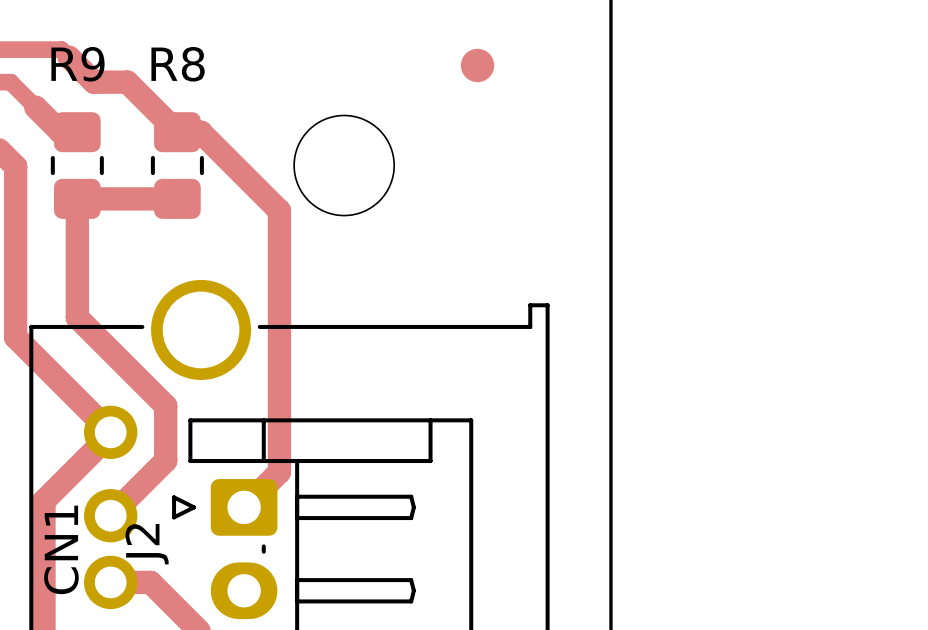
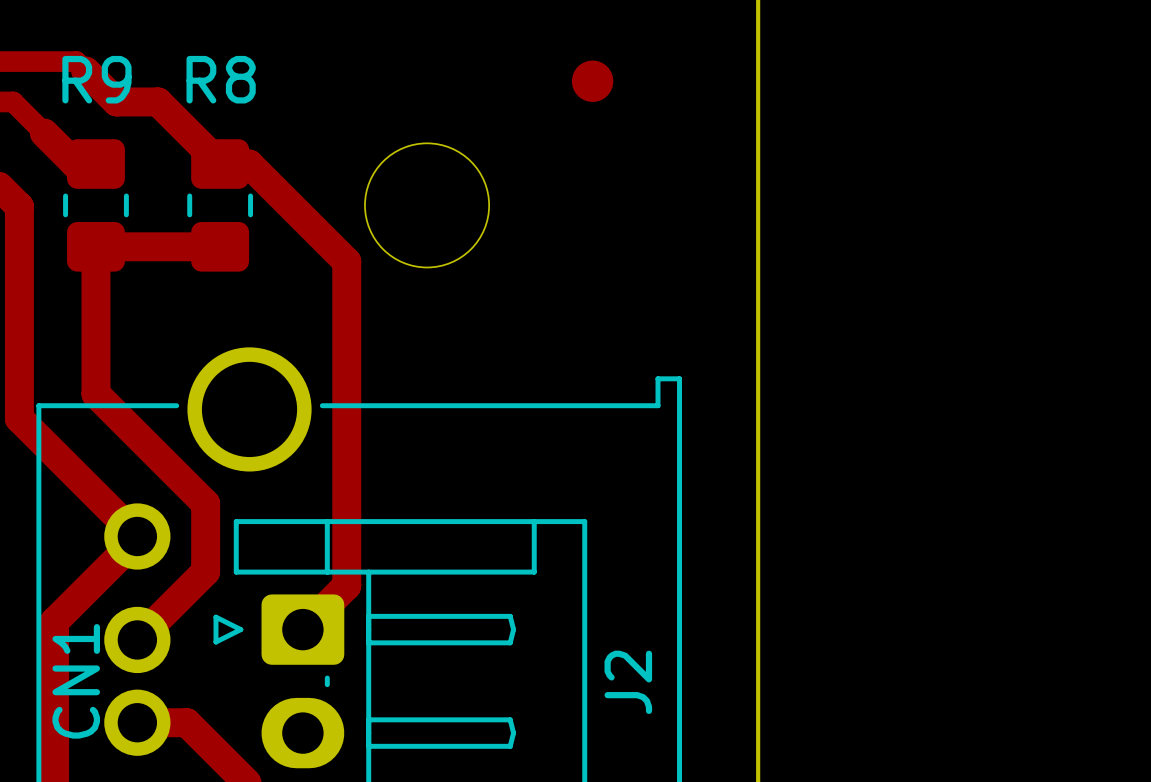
J2 name position: J2 (147, 544) -> J2 (628, 682)

